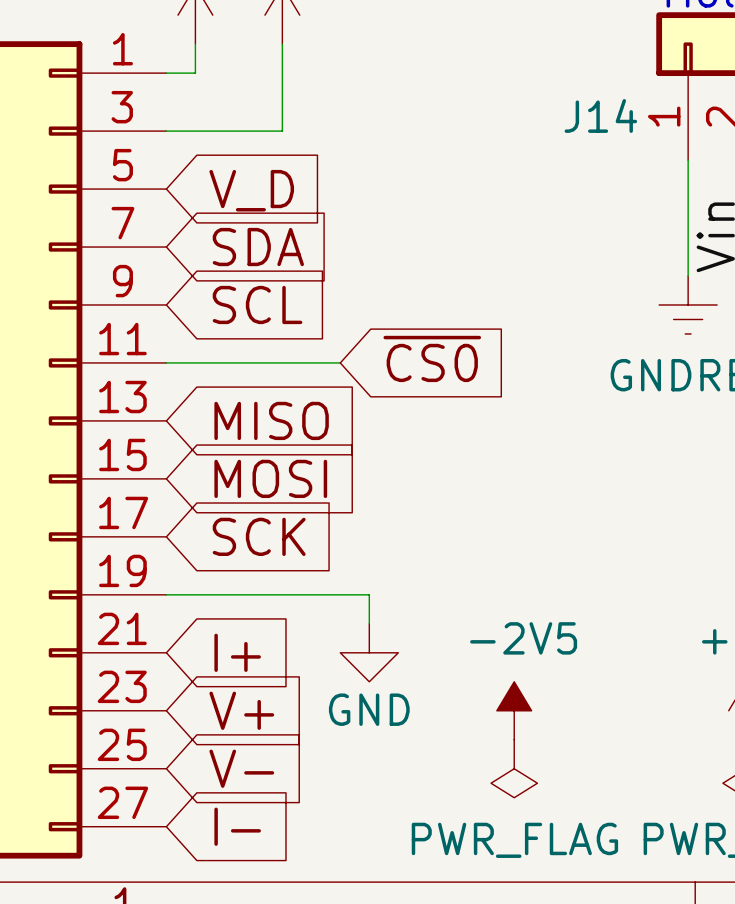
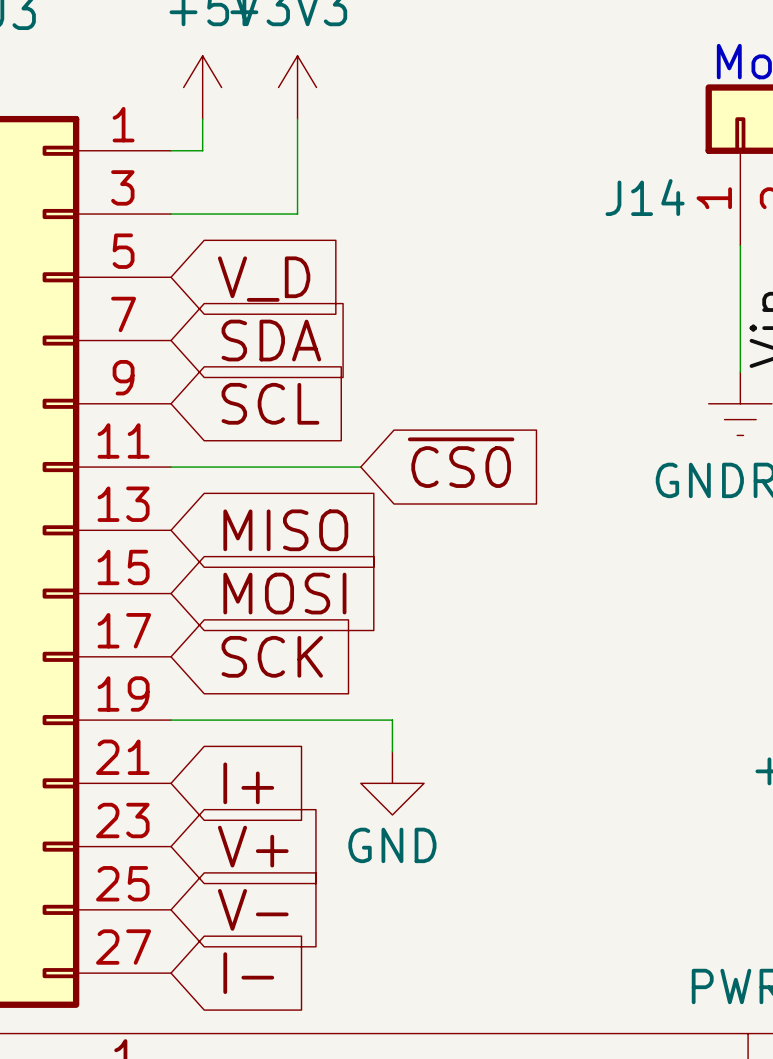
power symbol: -2V5 (514, 710) -> none
power symbol: PWR_FLAG (514, 768) -> none

